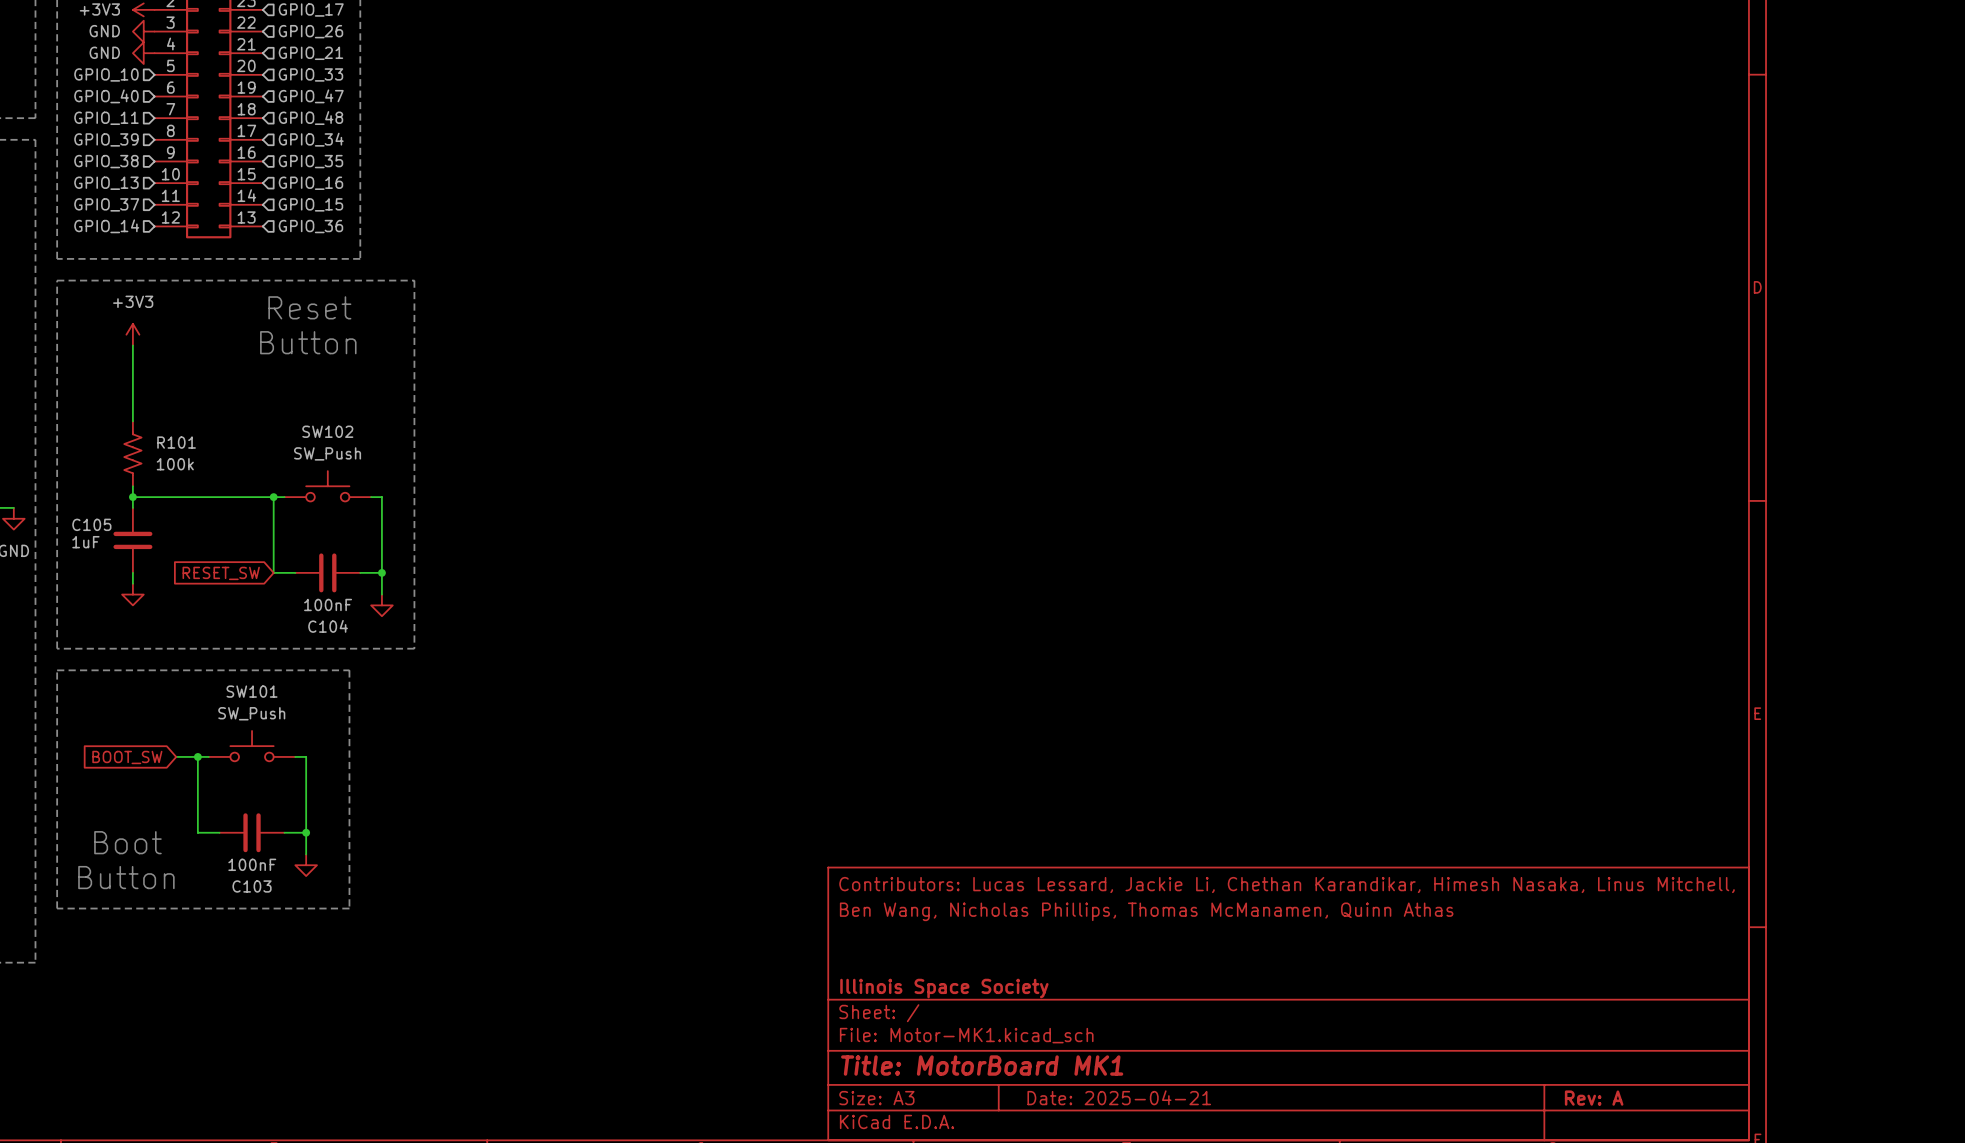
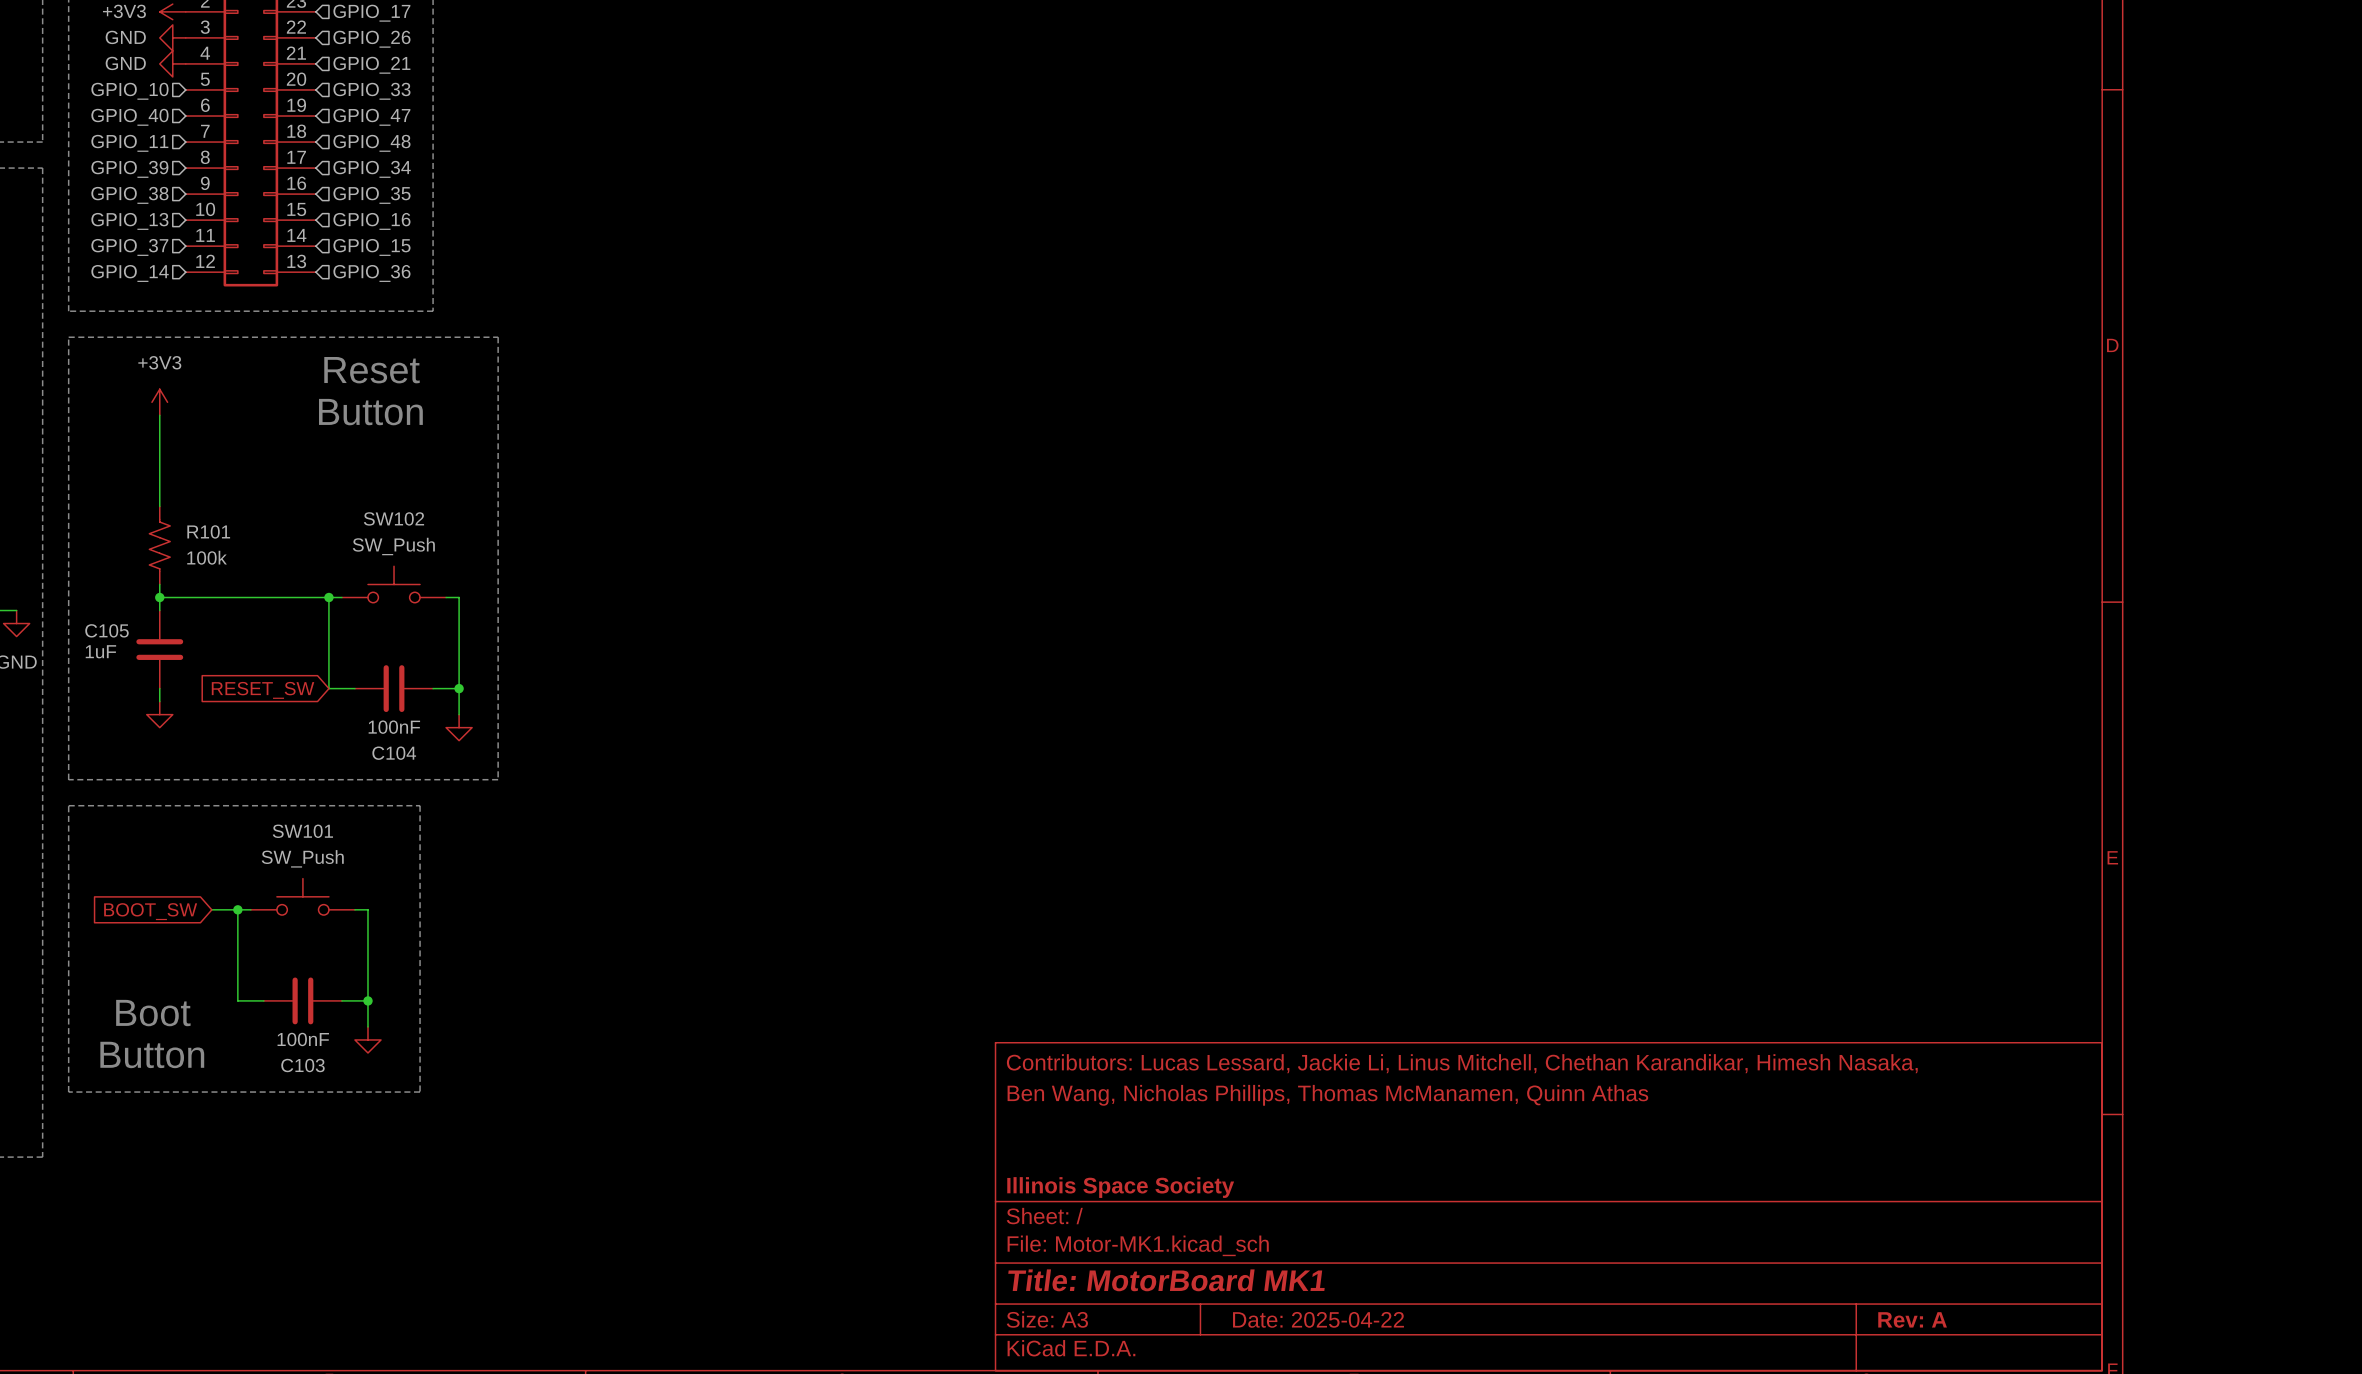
title block: Contributors: Lucas Lessard, Jackie Li, Chethan Karandikar, Himesh Nasaka, Linus Mitchell, (1287, 885) -> Contributors: Lucas Lessard, Jackie Li, Linus Mitchell, Chethan Karandikar, Himesh Nasaka, (1462, 1063)
title block: Date: 2025-04-21 (1119, 1097) -> Date: 2025-04-22 (1318, 1319)

